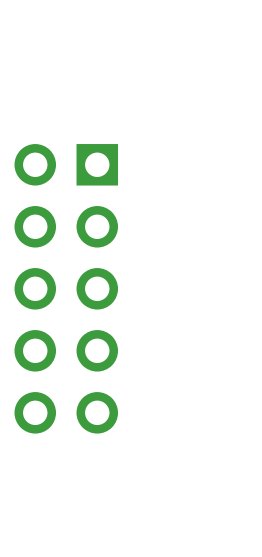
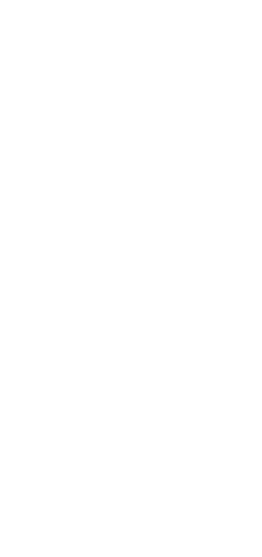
part: (66, 288) -> none

